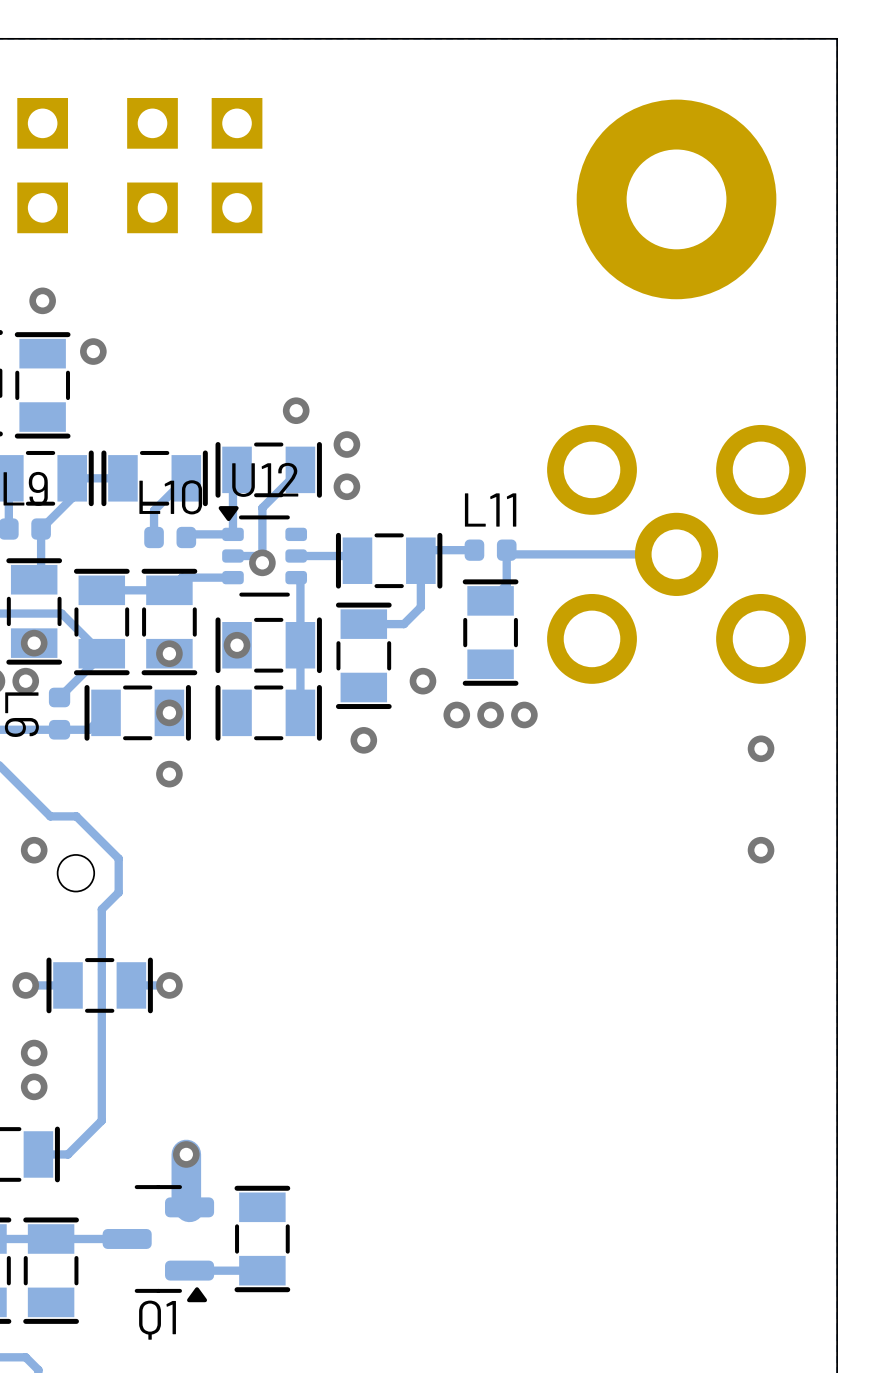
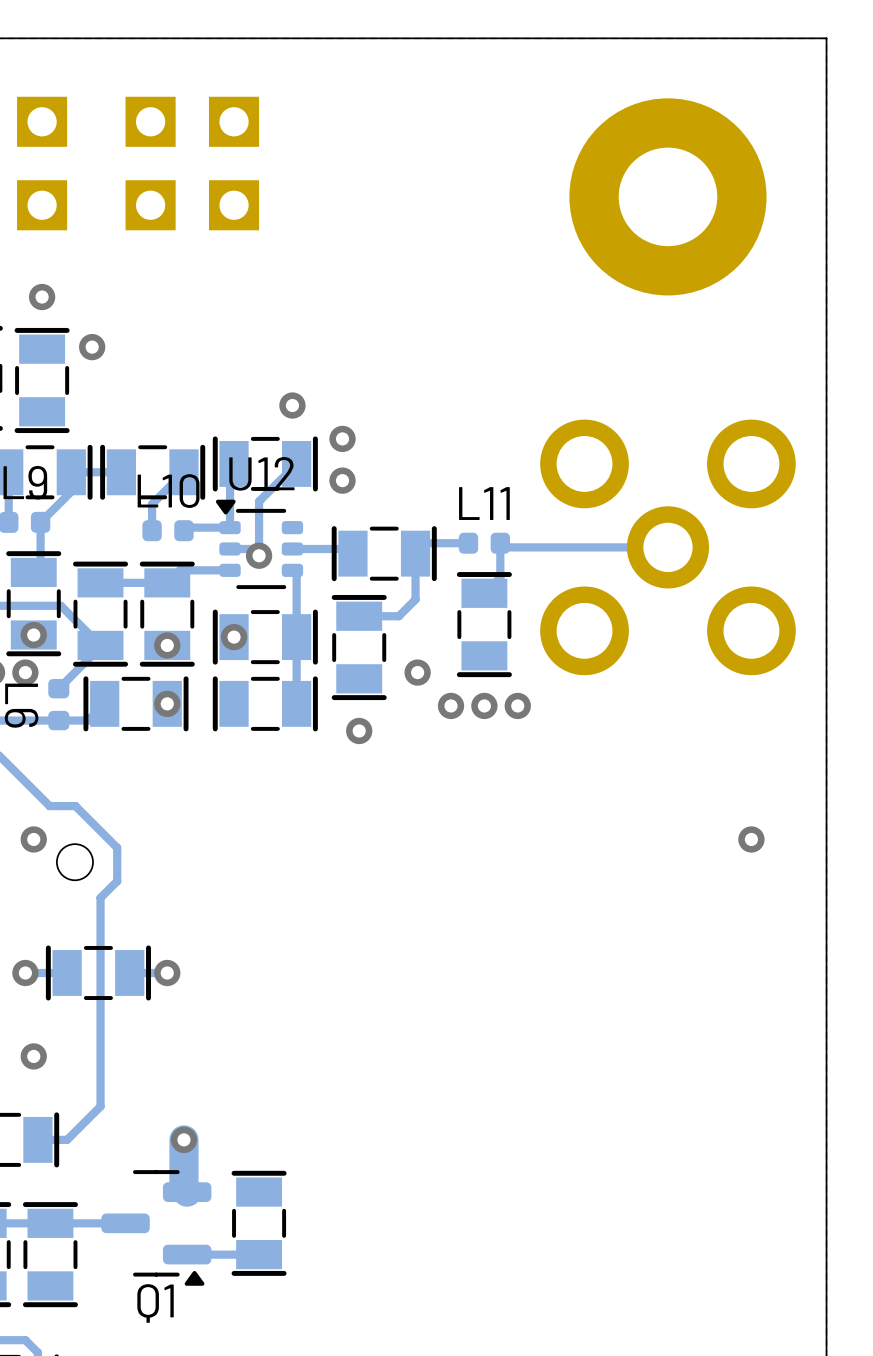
via: (761, 748) -> none
via: (169, 774) -> none
via: (34, 1053) -> none
via: none -> (33, 1056)
via: (34, 1086) -> none

